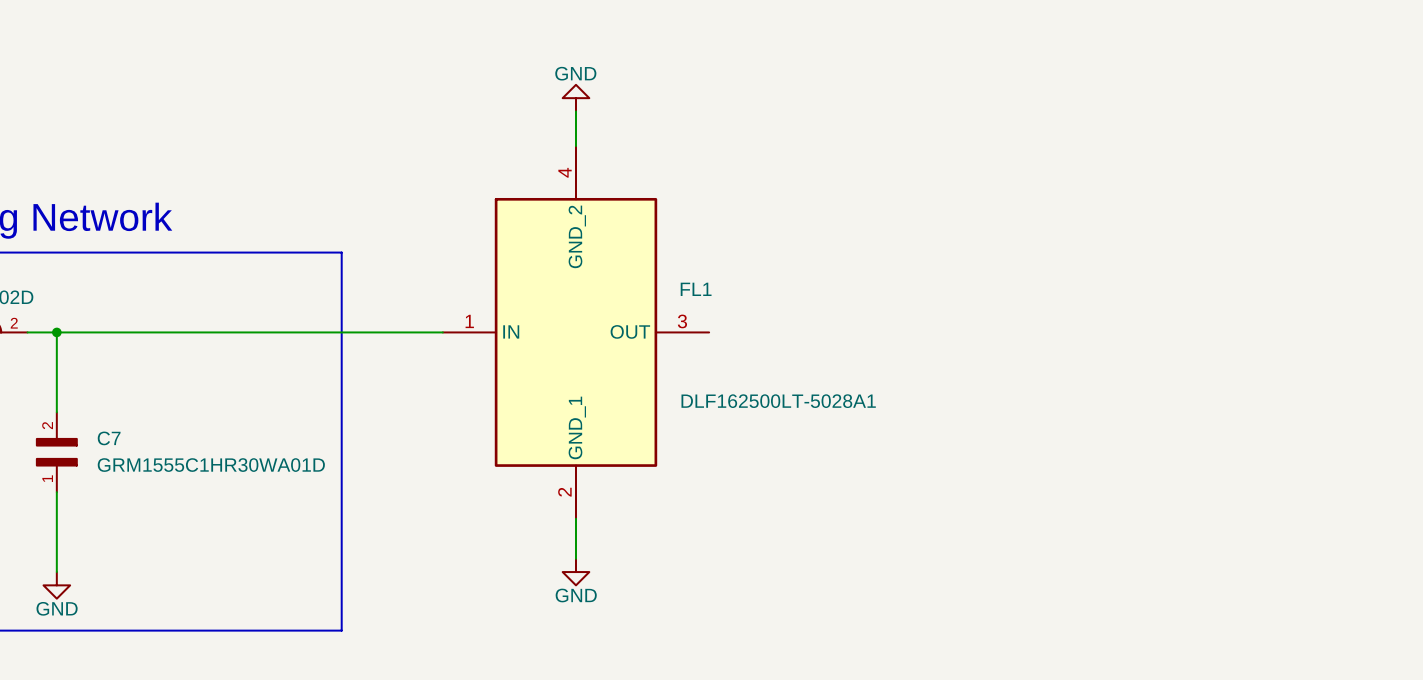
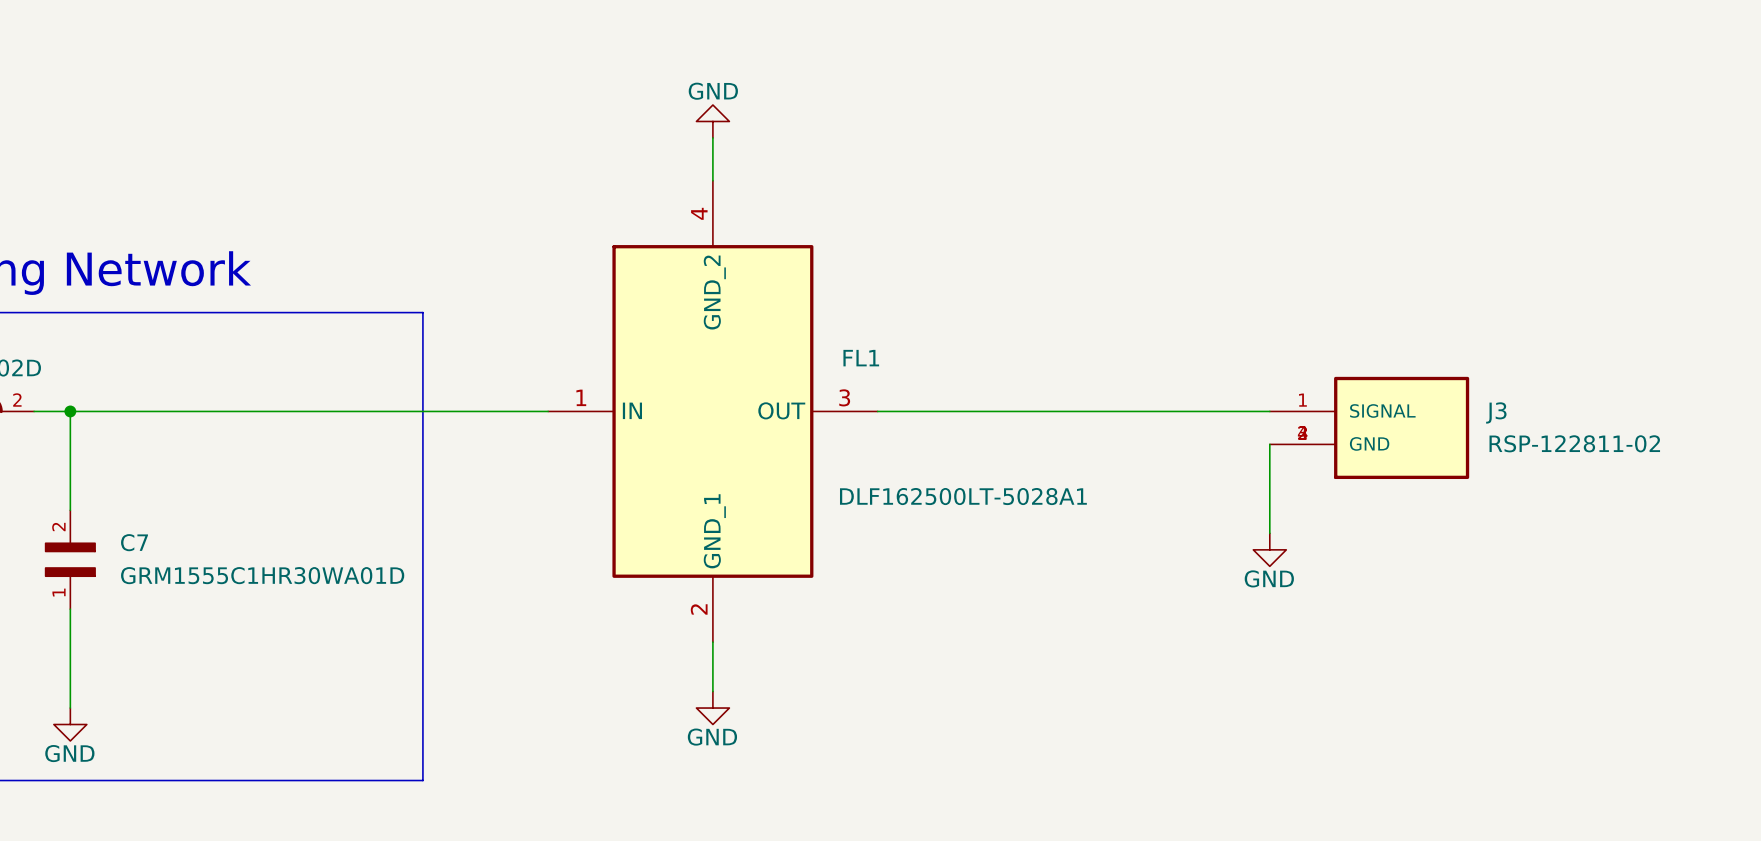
wire: none -> (877, 411) (1269, 411)
J3: none -> RSP-122811-02 (1369, 427)
wire: none -> (1269, 444) (1269, 533)
power symbol: none -> GND (1269, 549)

